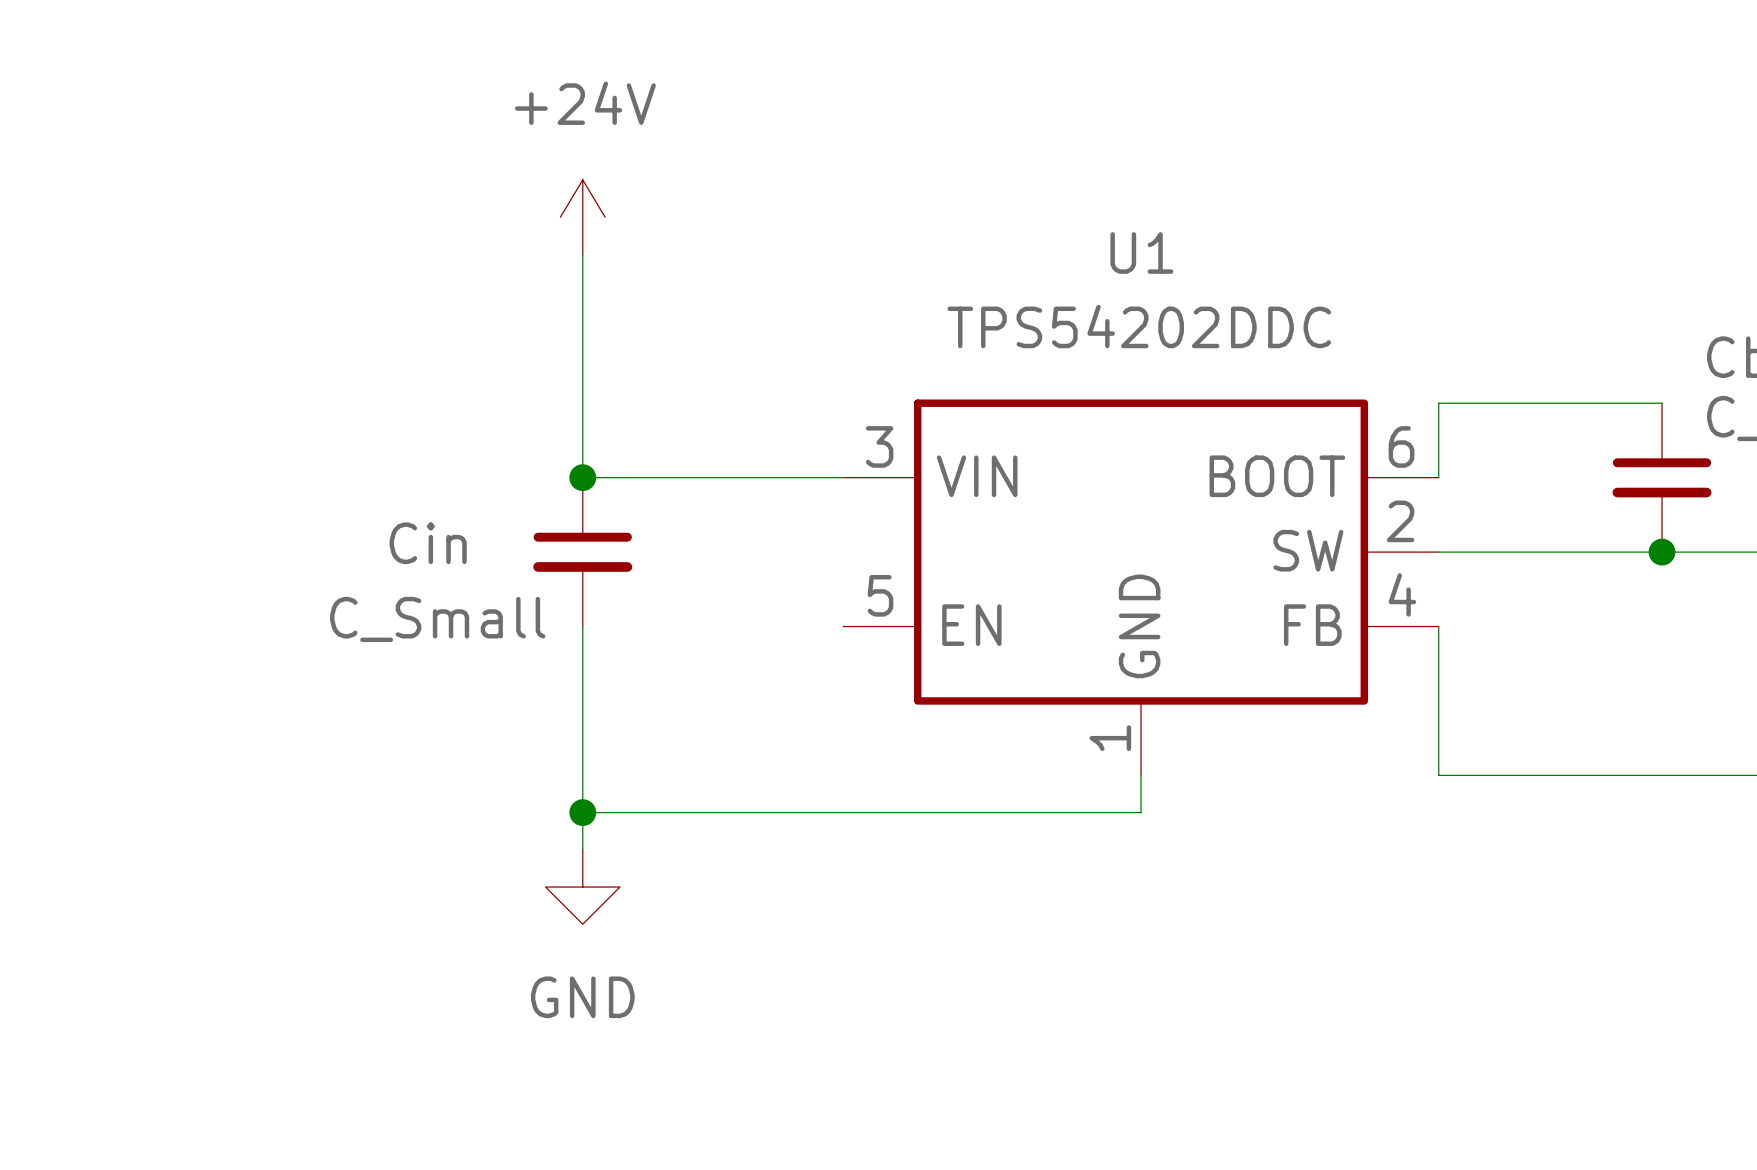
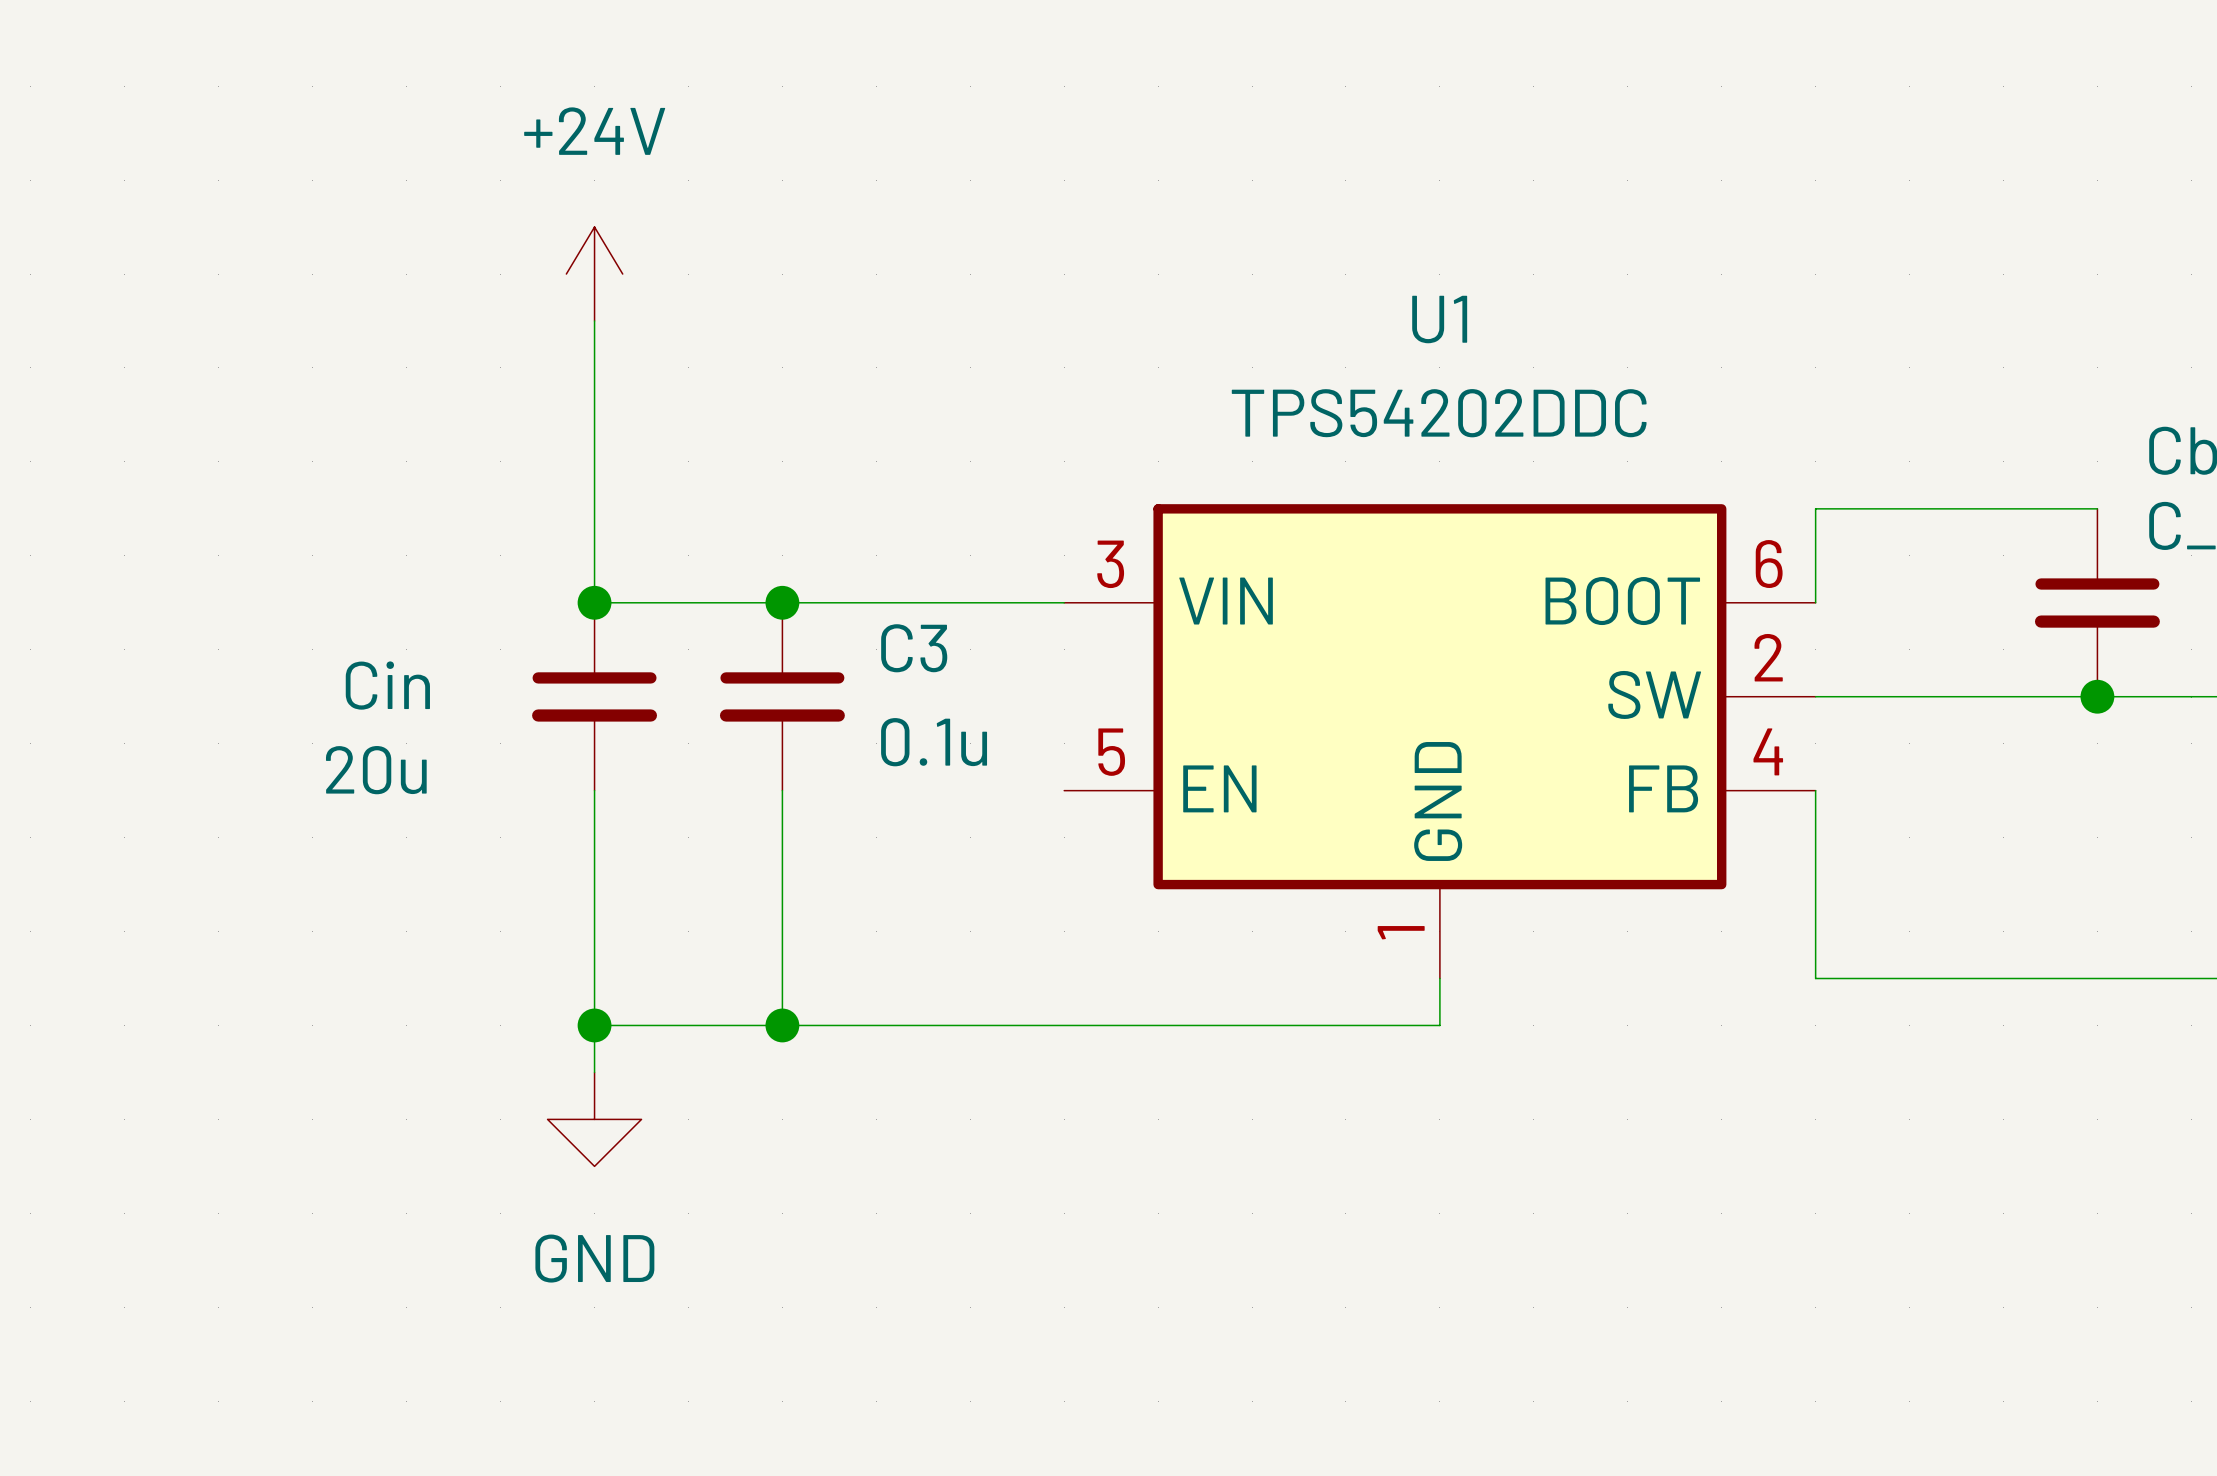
power symbol position: +24V (582, 217) -> +24V (594, 274)
wire: (582, 254) (582, 477) -> (594, 321) (594, 602) (735, 602)
junction: none -> (594, 602)
junction position: (582, 477) -> (782, 602)
Cin: none -> 20u (594, 696)
Cin: C_Small (582, 552) -> none
C3: none -> 0.1u (782, 696)
wire: (582, 626) (582, 849) -> (594, 790) (594, 1072)
wire: none -> (782, 790) (782, 1025)
wire: none -> (594, 1025) (735, 1025)
junction: none -> (594, 1025)
junction position: (582, 812) -> (782, 1025)
power symbol position: GND (582, 887) -> GND (594, 1119)

